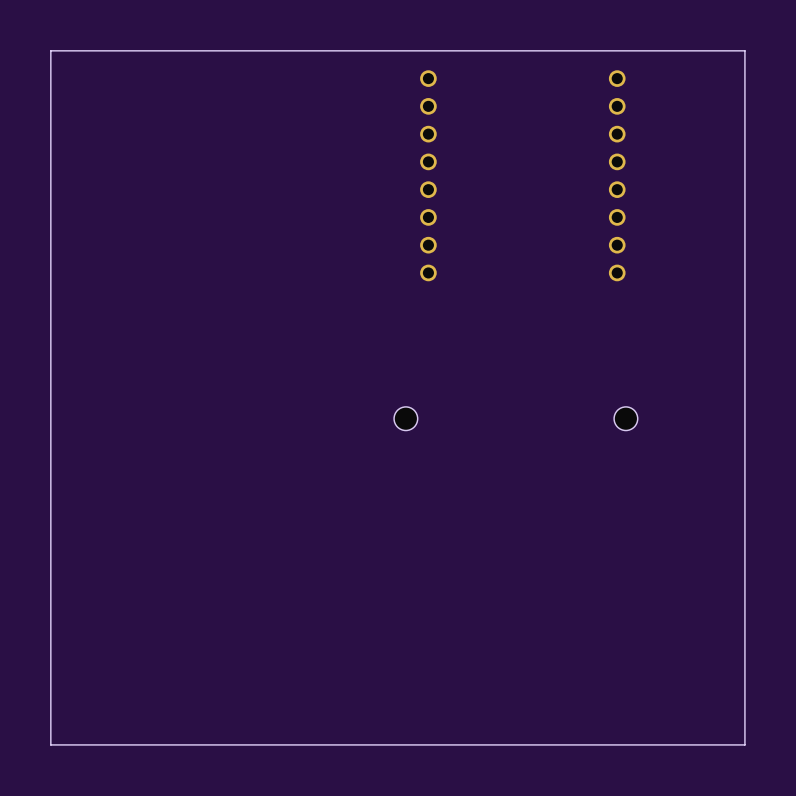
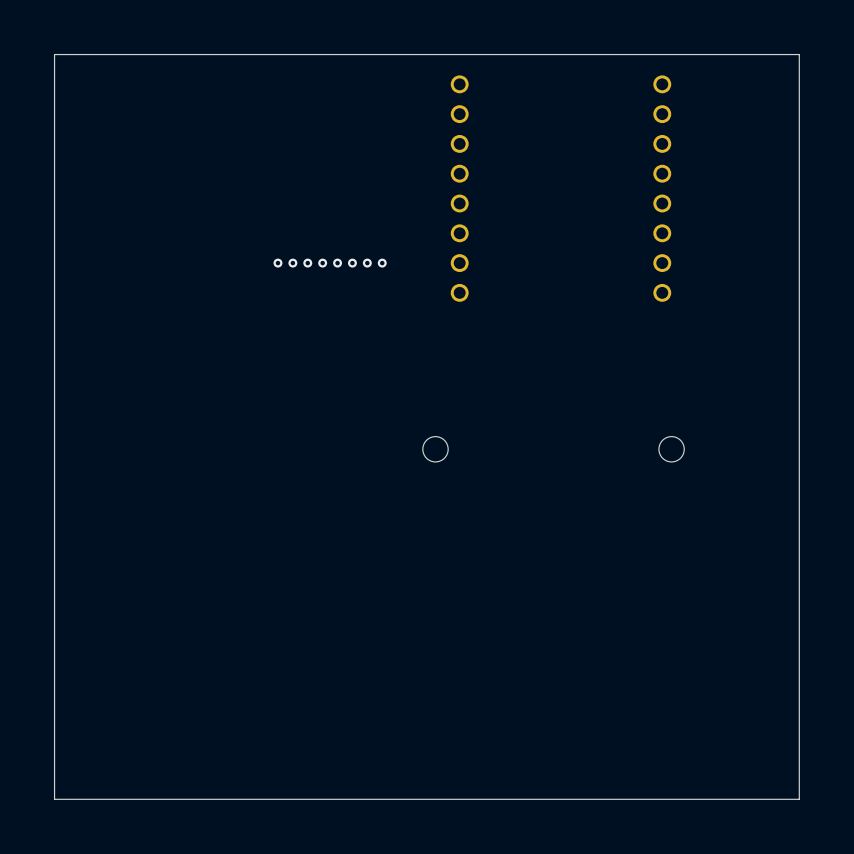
via: none -> (277, 263)
via: none -> (292, 263)
via: none -> (307, 263)
via: none -> (322, 263)
via: none -> (337, 263)
via: none -> (352, 263)
via: none -> (367, 263)
via: none -> (382, 263)

